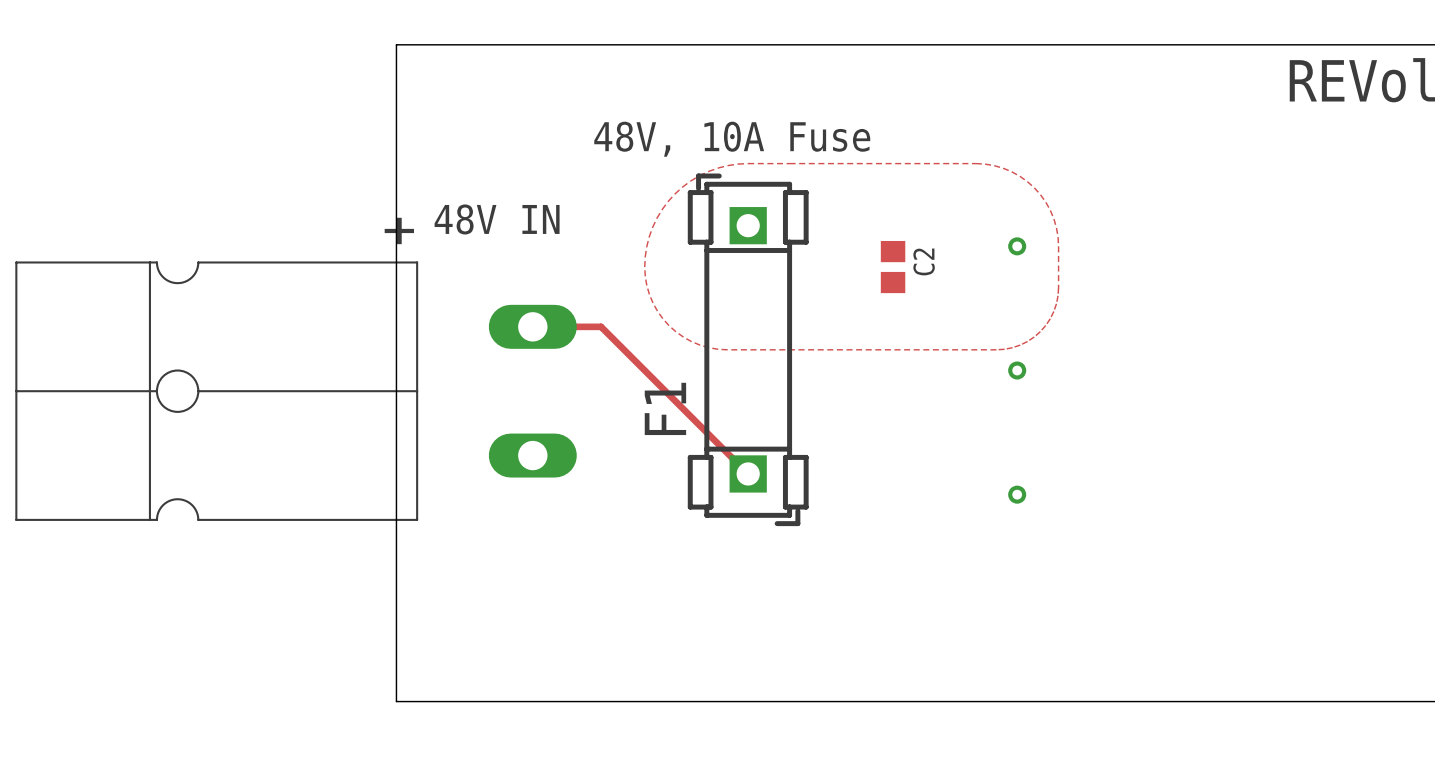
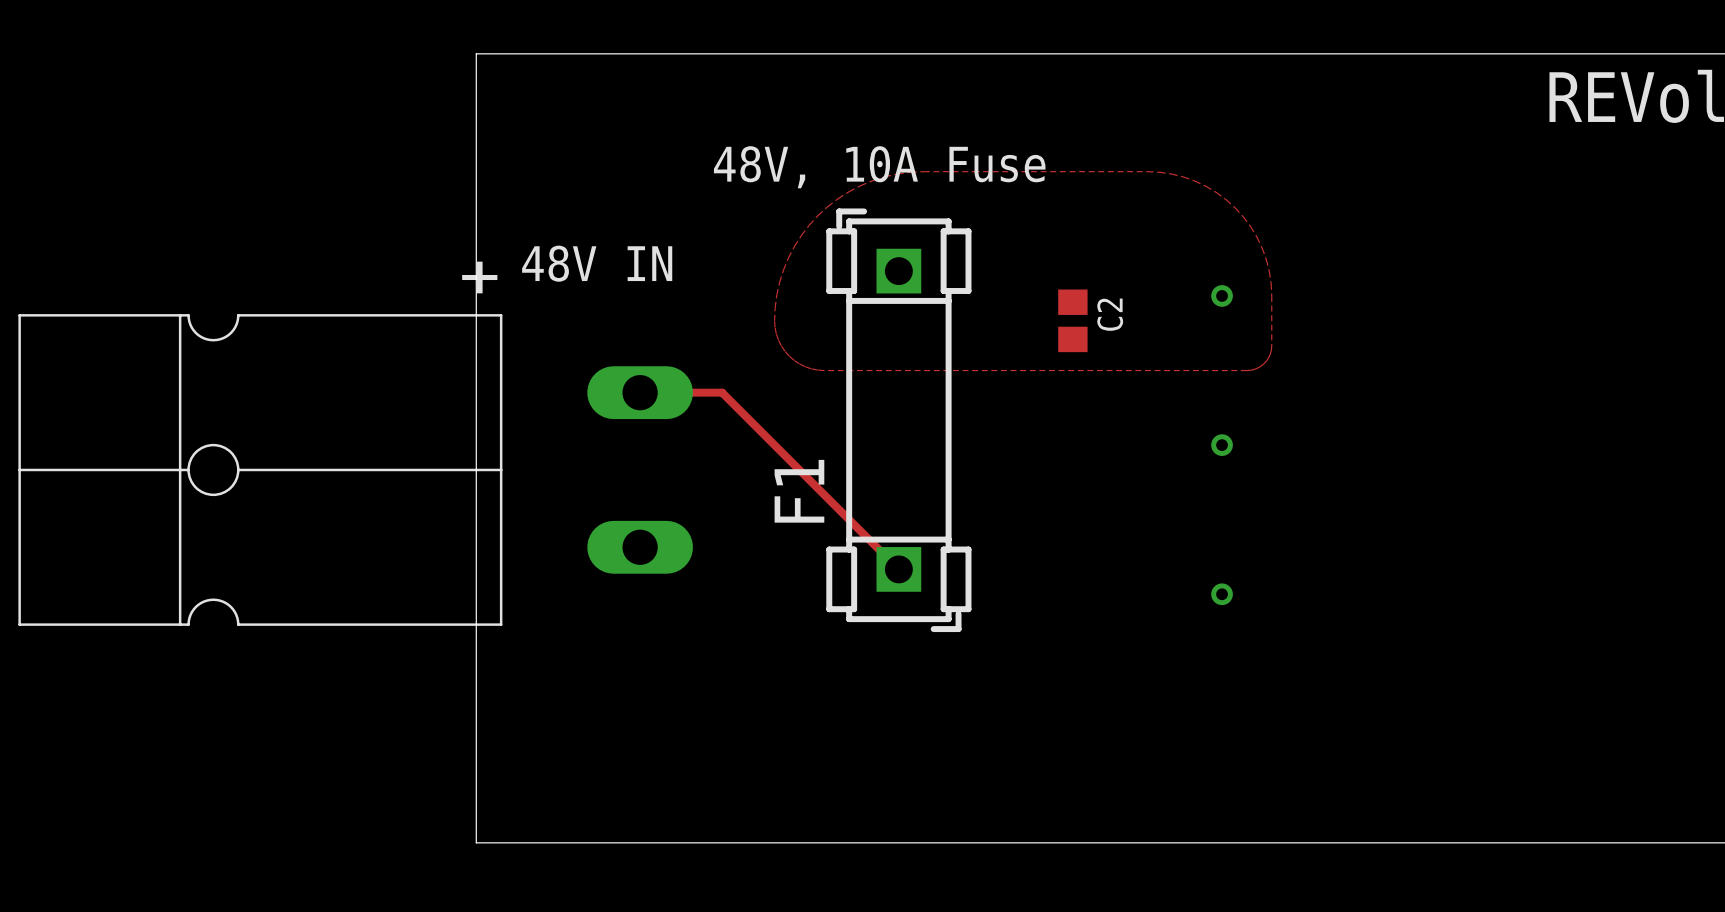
zone outline: (1058, 246) (1053, 219) (1040, 194) (1019, 176) (994, 165) (975, 163) (738, 164) (718, 168) (699, 175) (682, 187) (668, 201) (656, 218) (649, 237) (644, 267) (649, 294) (662, 318) (675, 331) (691, 341) (718, 349) (1004, 349) (1027, 341) (1040, 331) (1053, 311) (1058, 290) -> (1271, 295) (1266, 259) (1250, 226) (1235, 208) (1216, 192) (1183, 177) (1147, 171) (910, 172) (885, 176) (860, 185) (827, 206) (809, 224) (794, 246) (783, 269) (776, 294) (774, 320) (778, 339) (789, 355) (805, 366) (824, 370) (1246, 370) (1262, 365) (1268, 358) (1271, 348)

